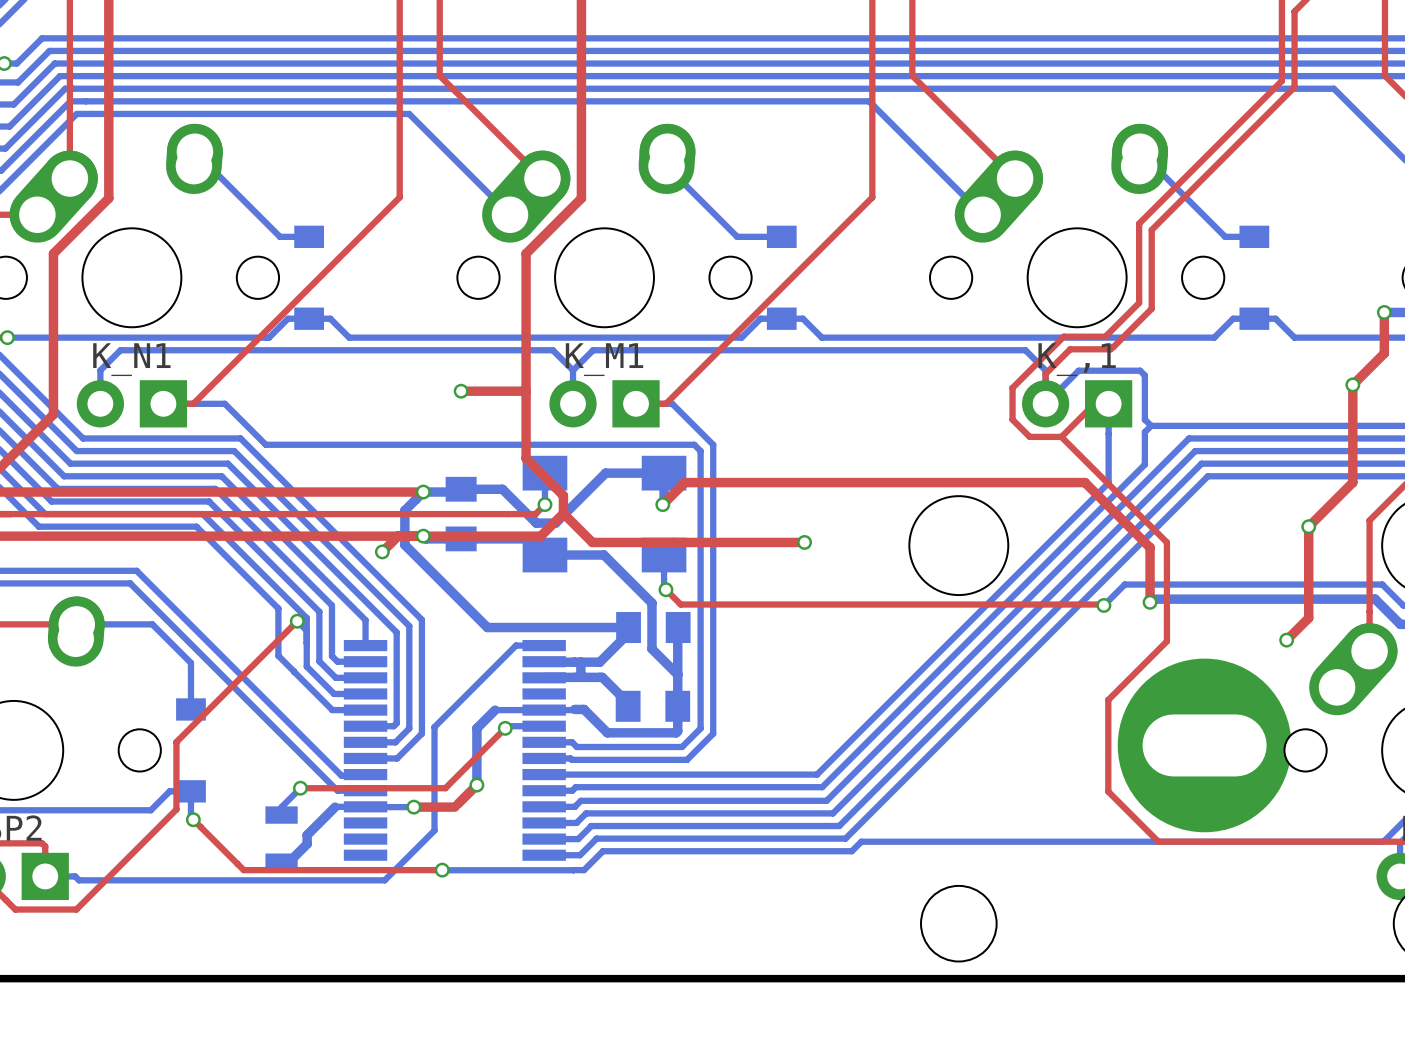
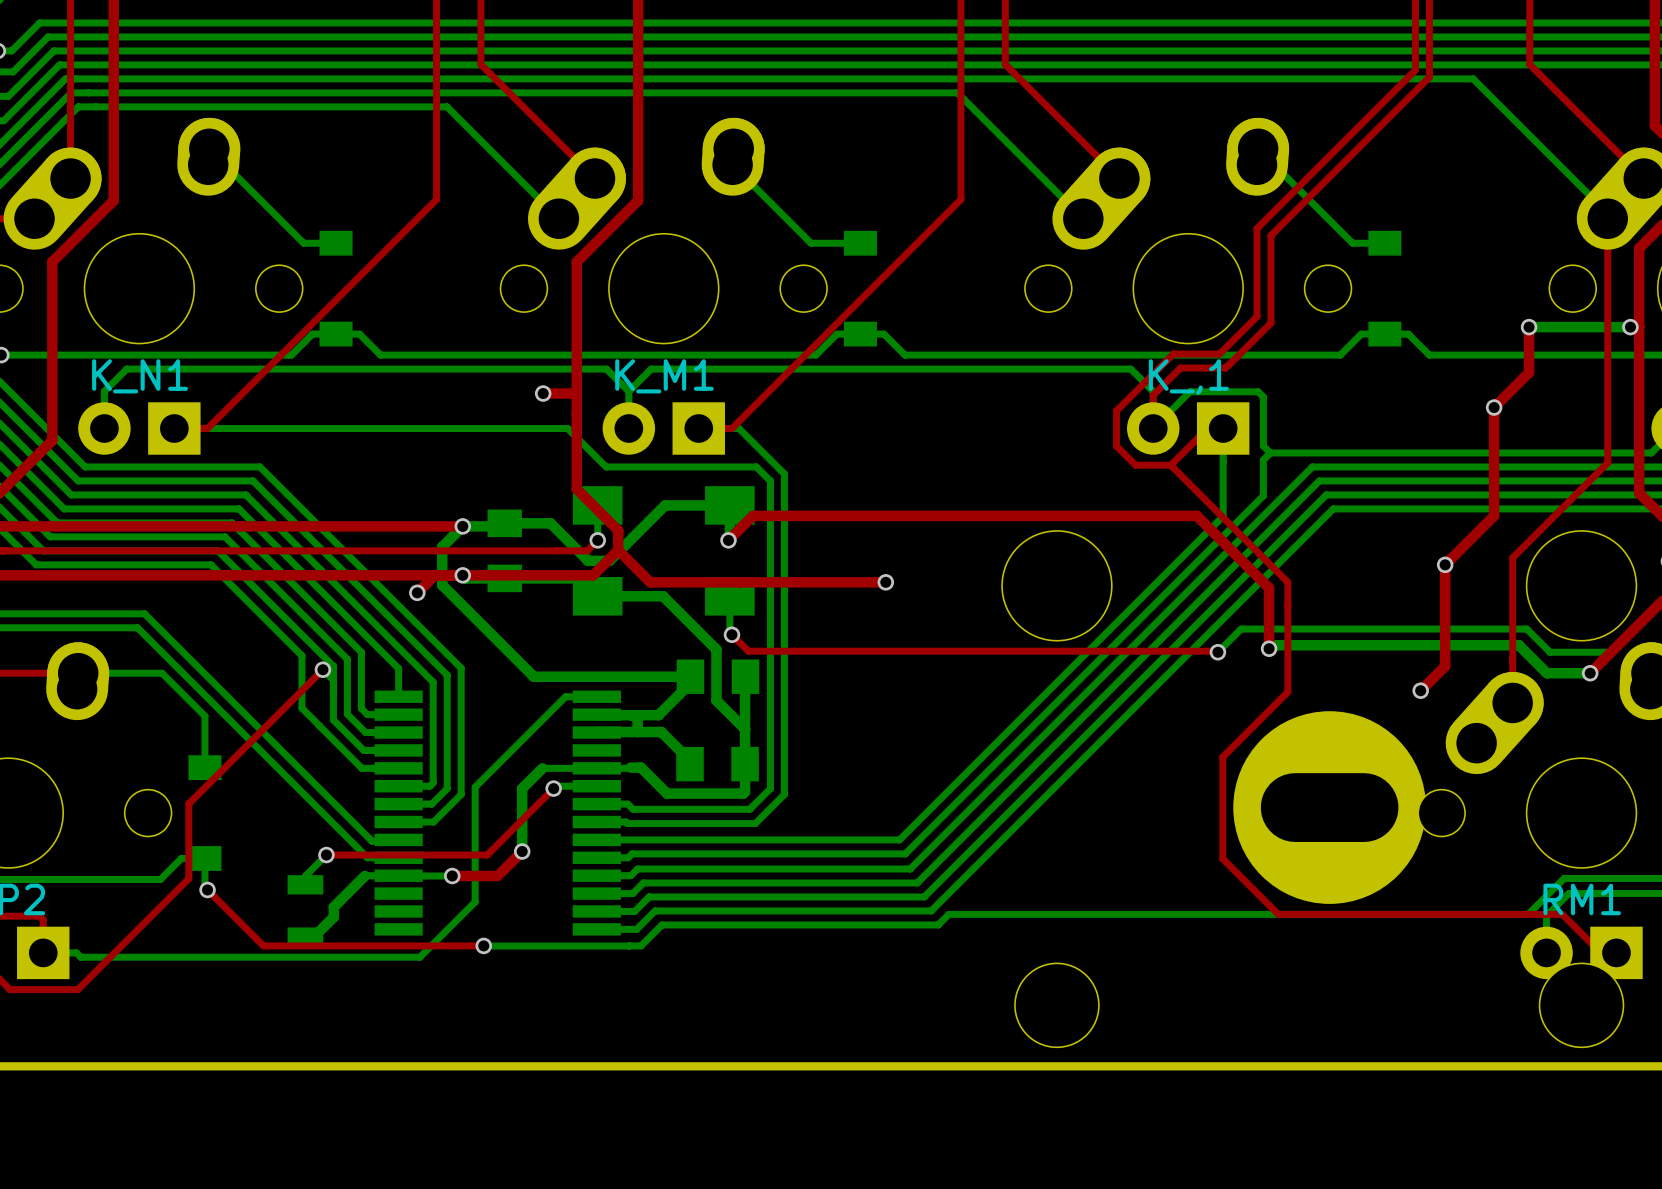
top track: none -> (543, 393) (576, 393)
top track: (461, 391) (526, 391) -> none
via position: (461, 391) -> (543, 393)
bottom track: (224, 403) (265, 444) (694, 444) -> (242, 428) (567, 428) (606, 466) (756, 466) (763, 473)

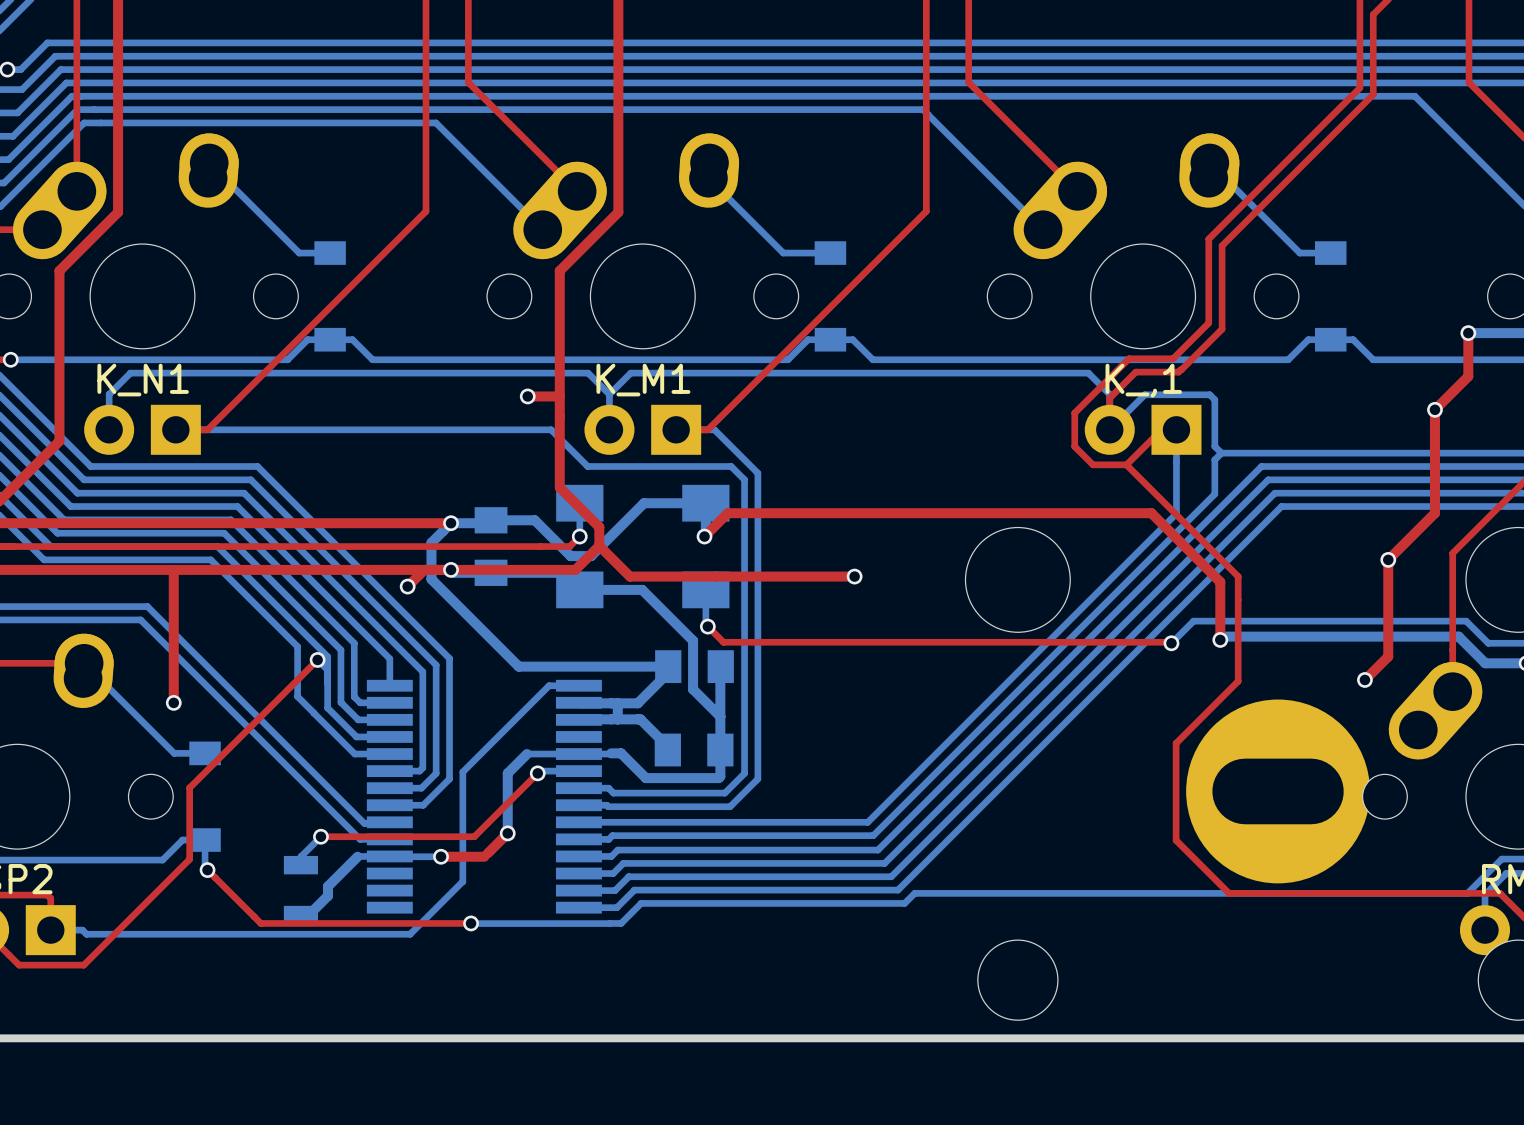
top track: none -> (173, 569) (173, 702)
bottom track: (78, 673) (162, 673) (204, 716) (204, 767) -> (84, 663) (174, 753) (205, 753)
via: none -> (173, 702)

